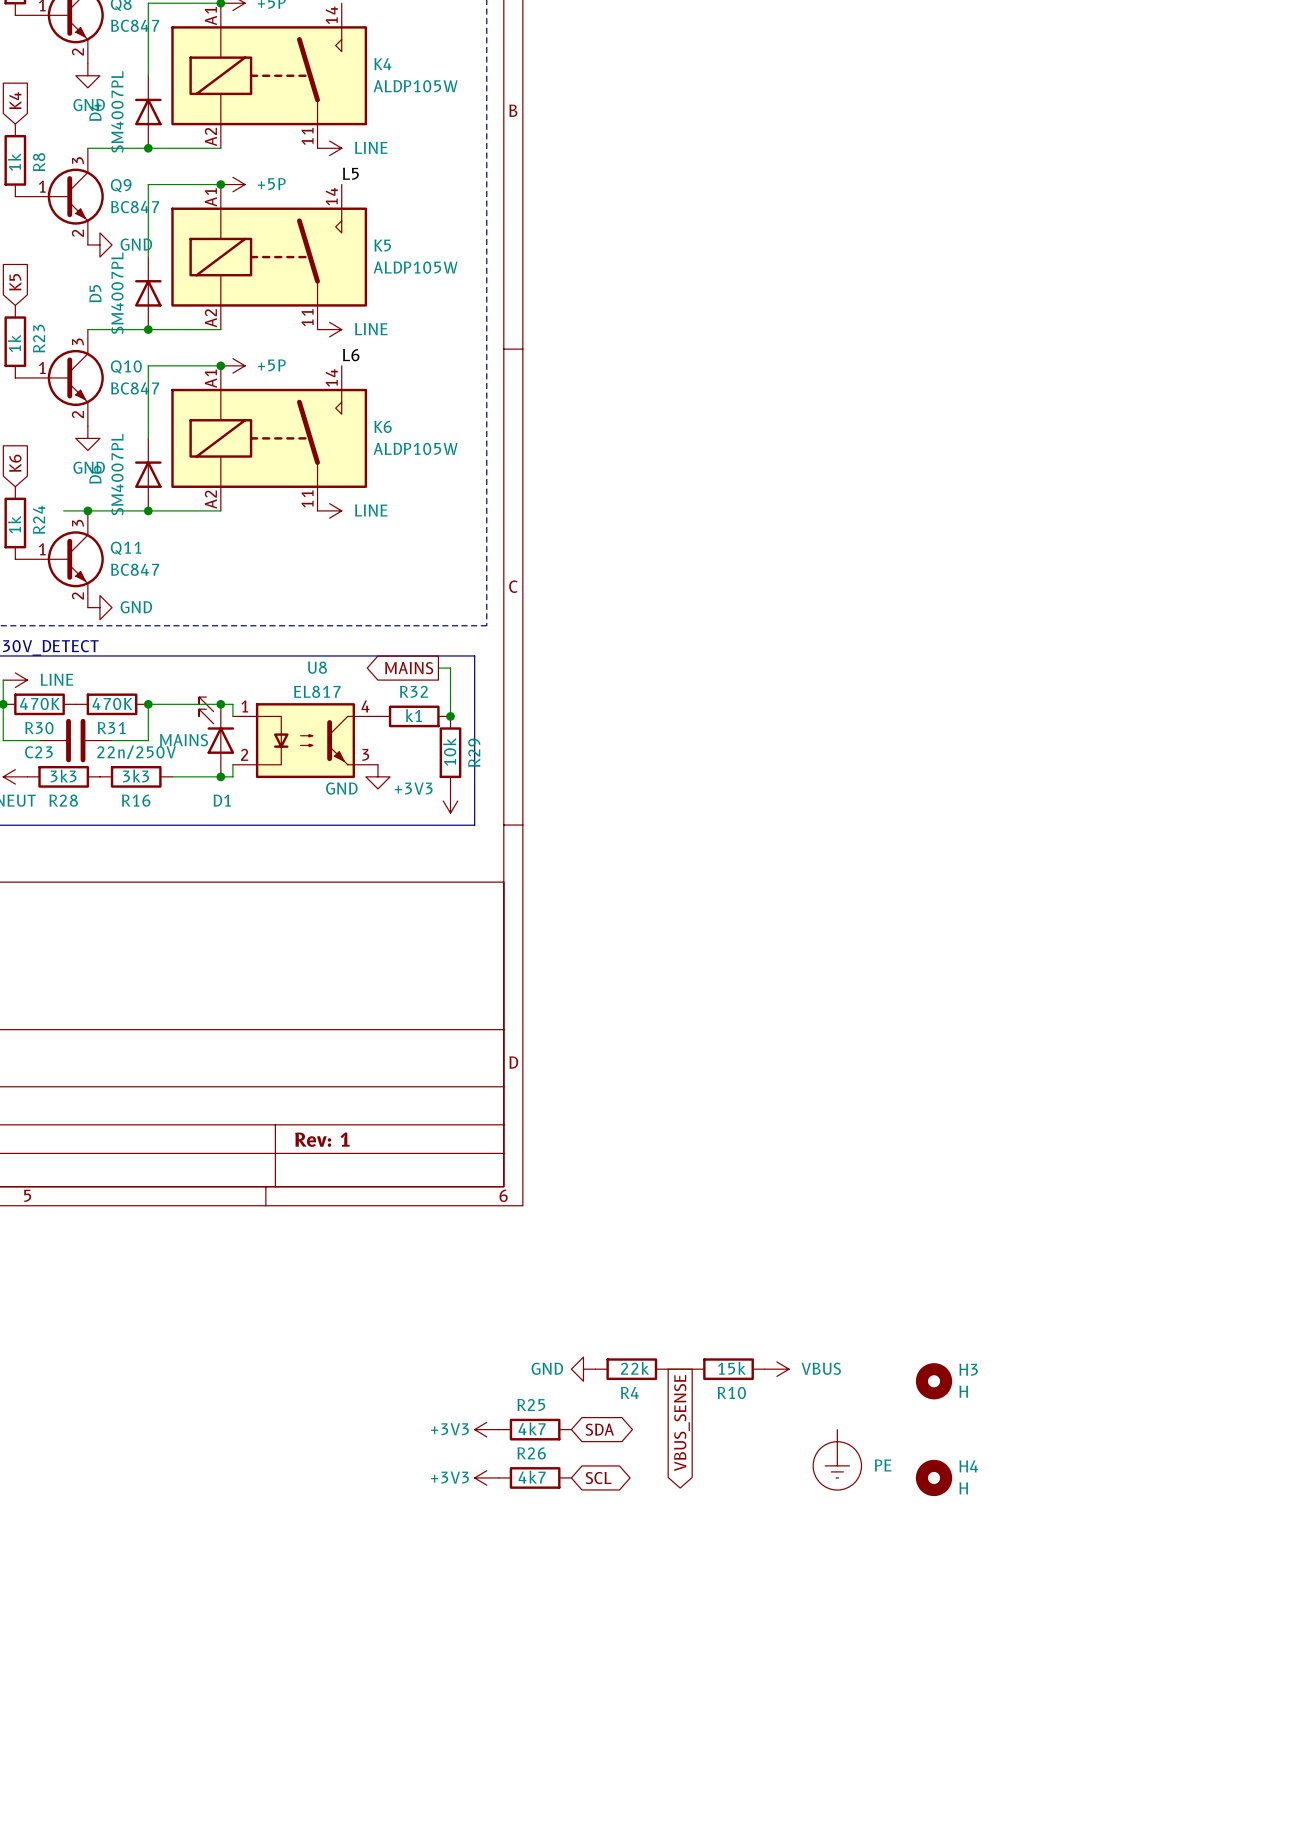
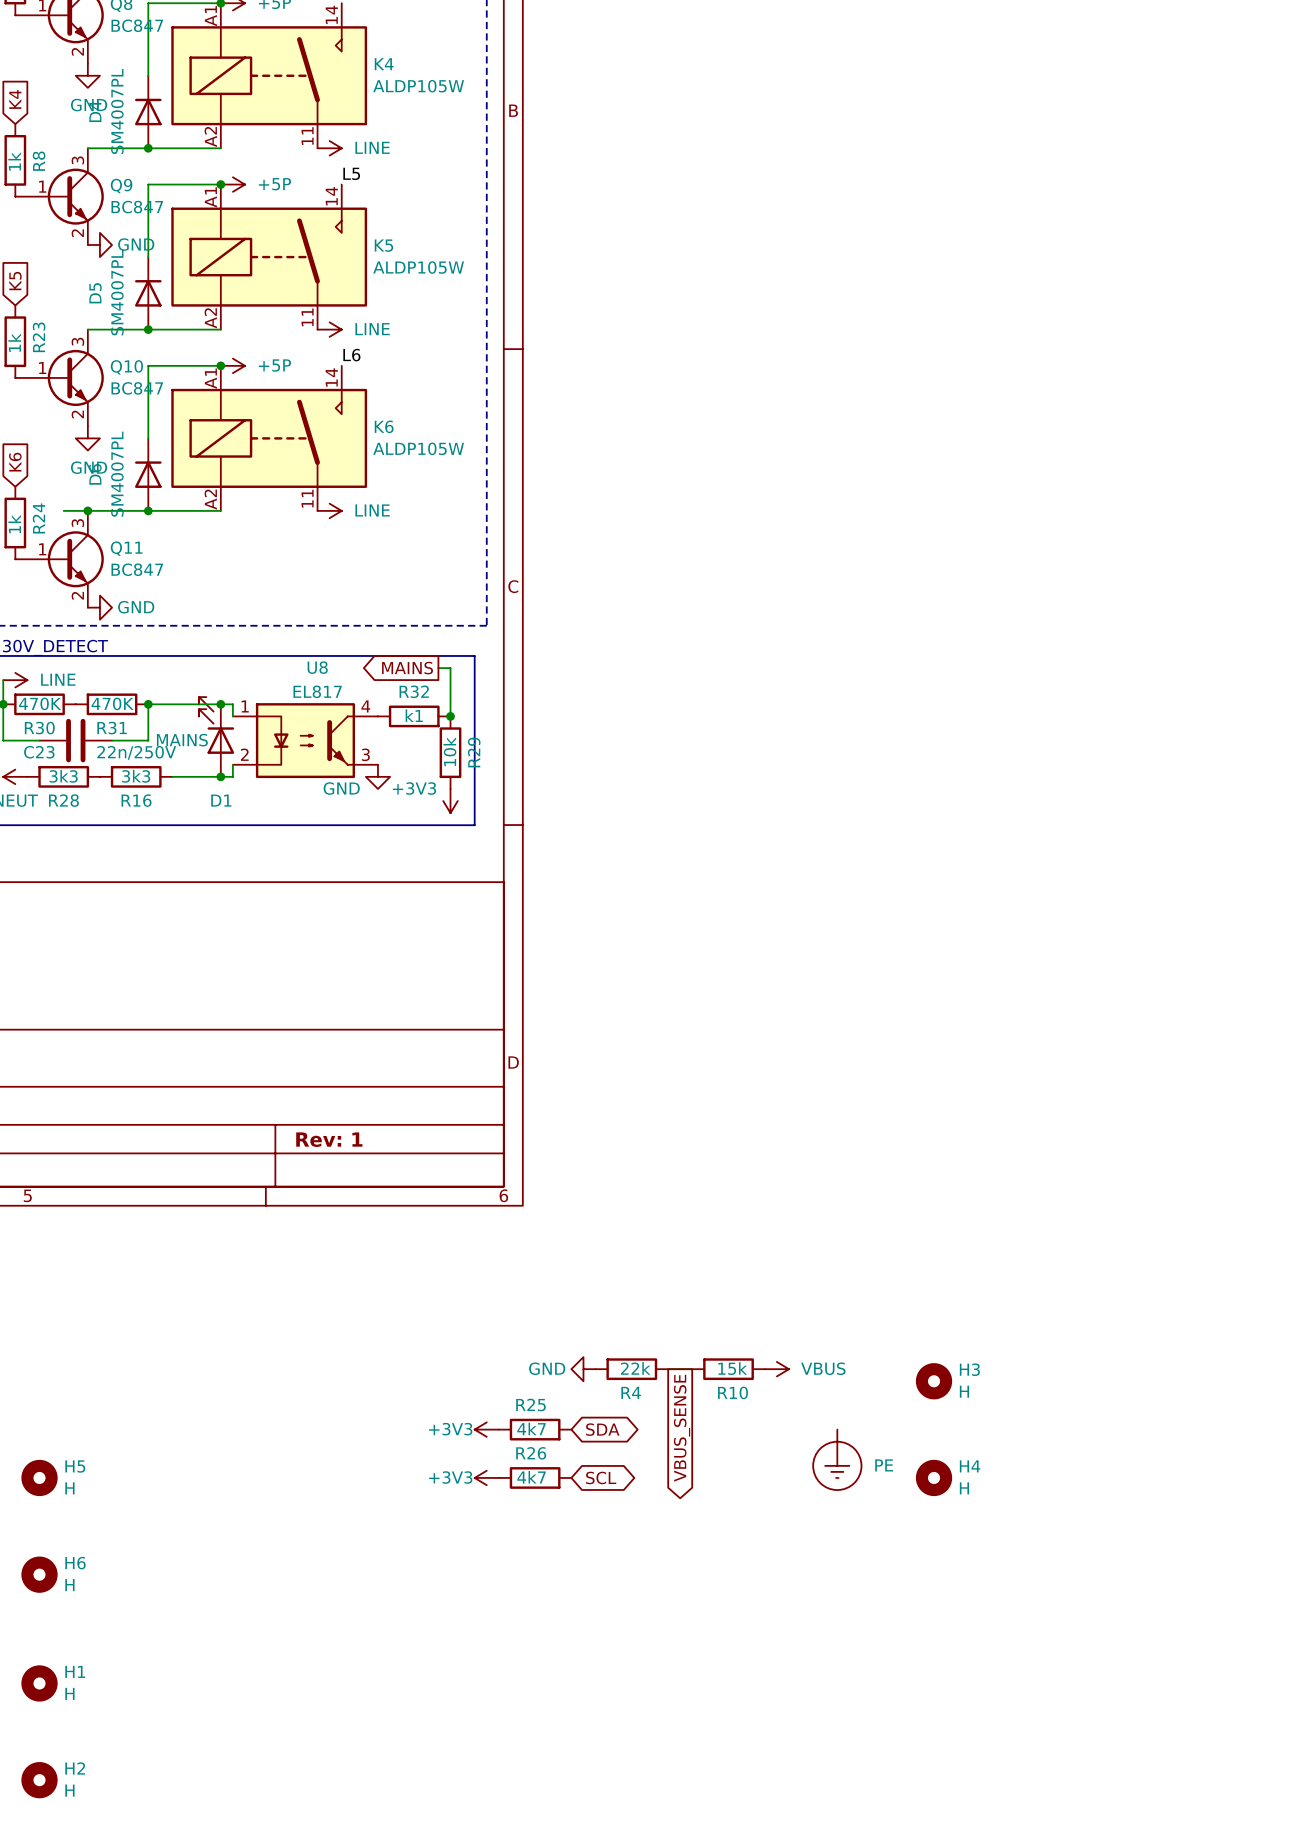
H5: none -> H (39, 1477)
H6: none -> H (39, 1574)
H1: none -> H (39, 1683)
H2: none -> H (39, 1780)

